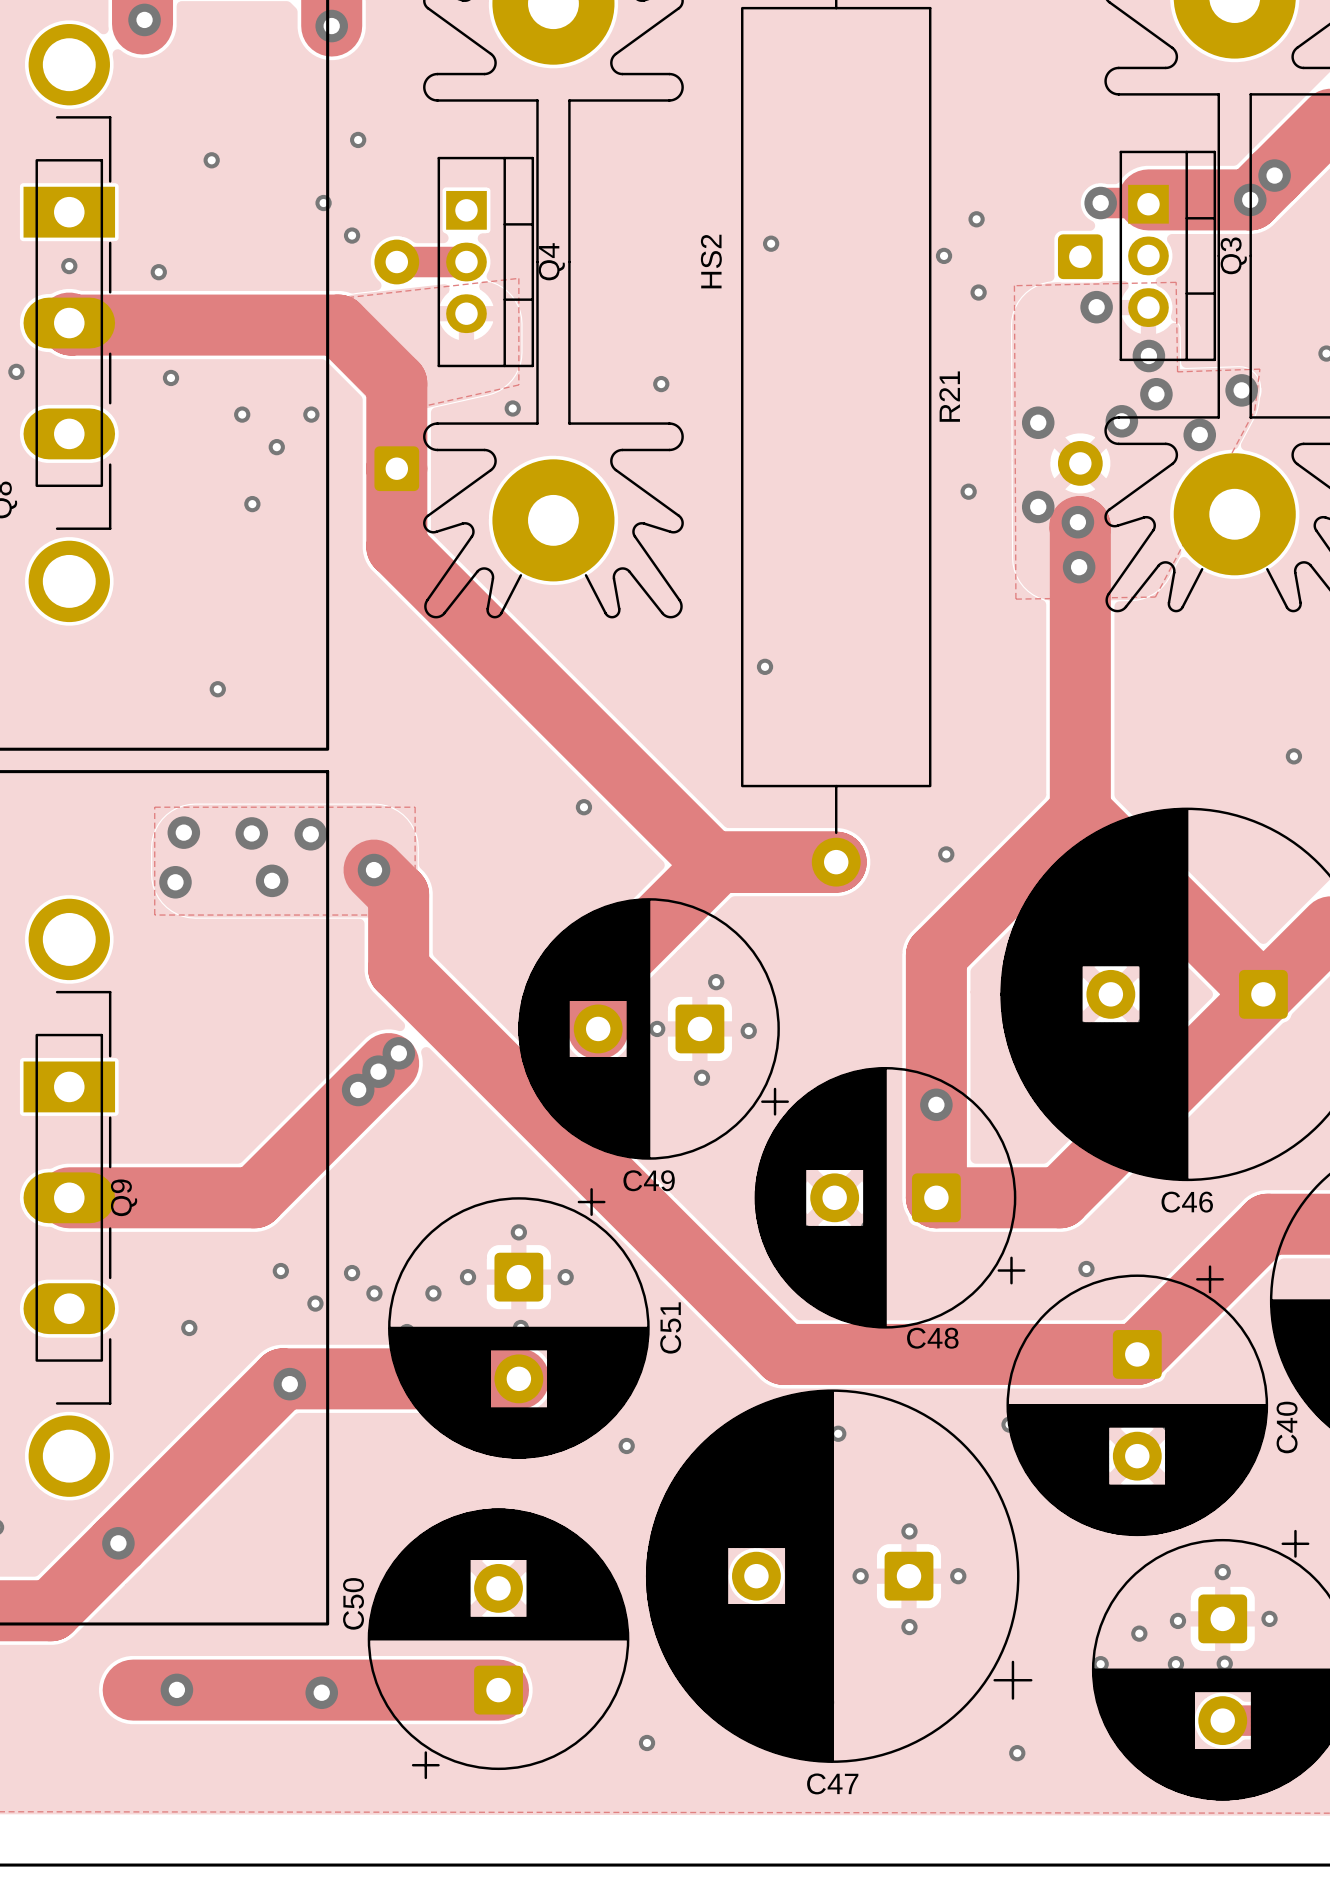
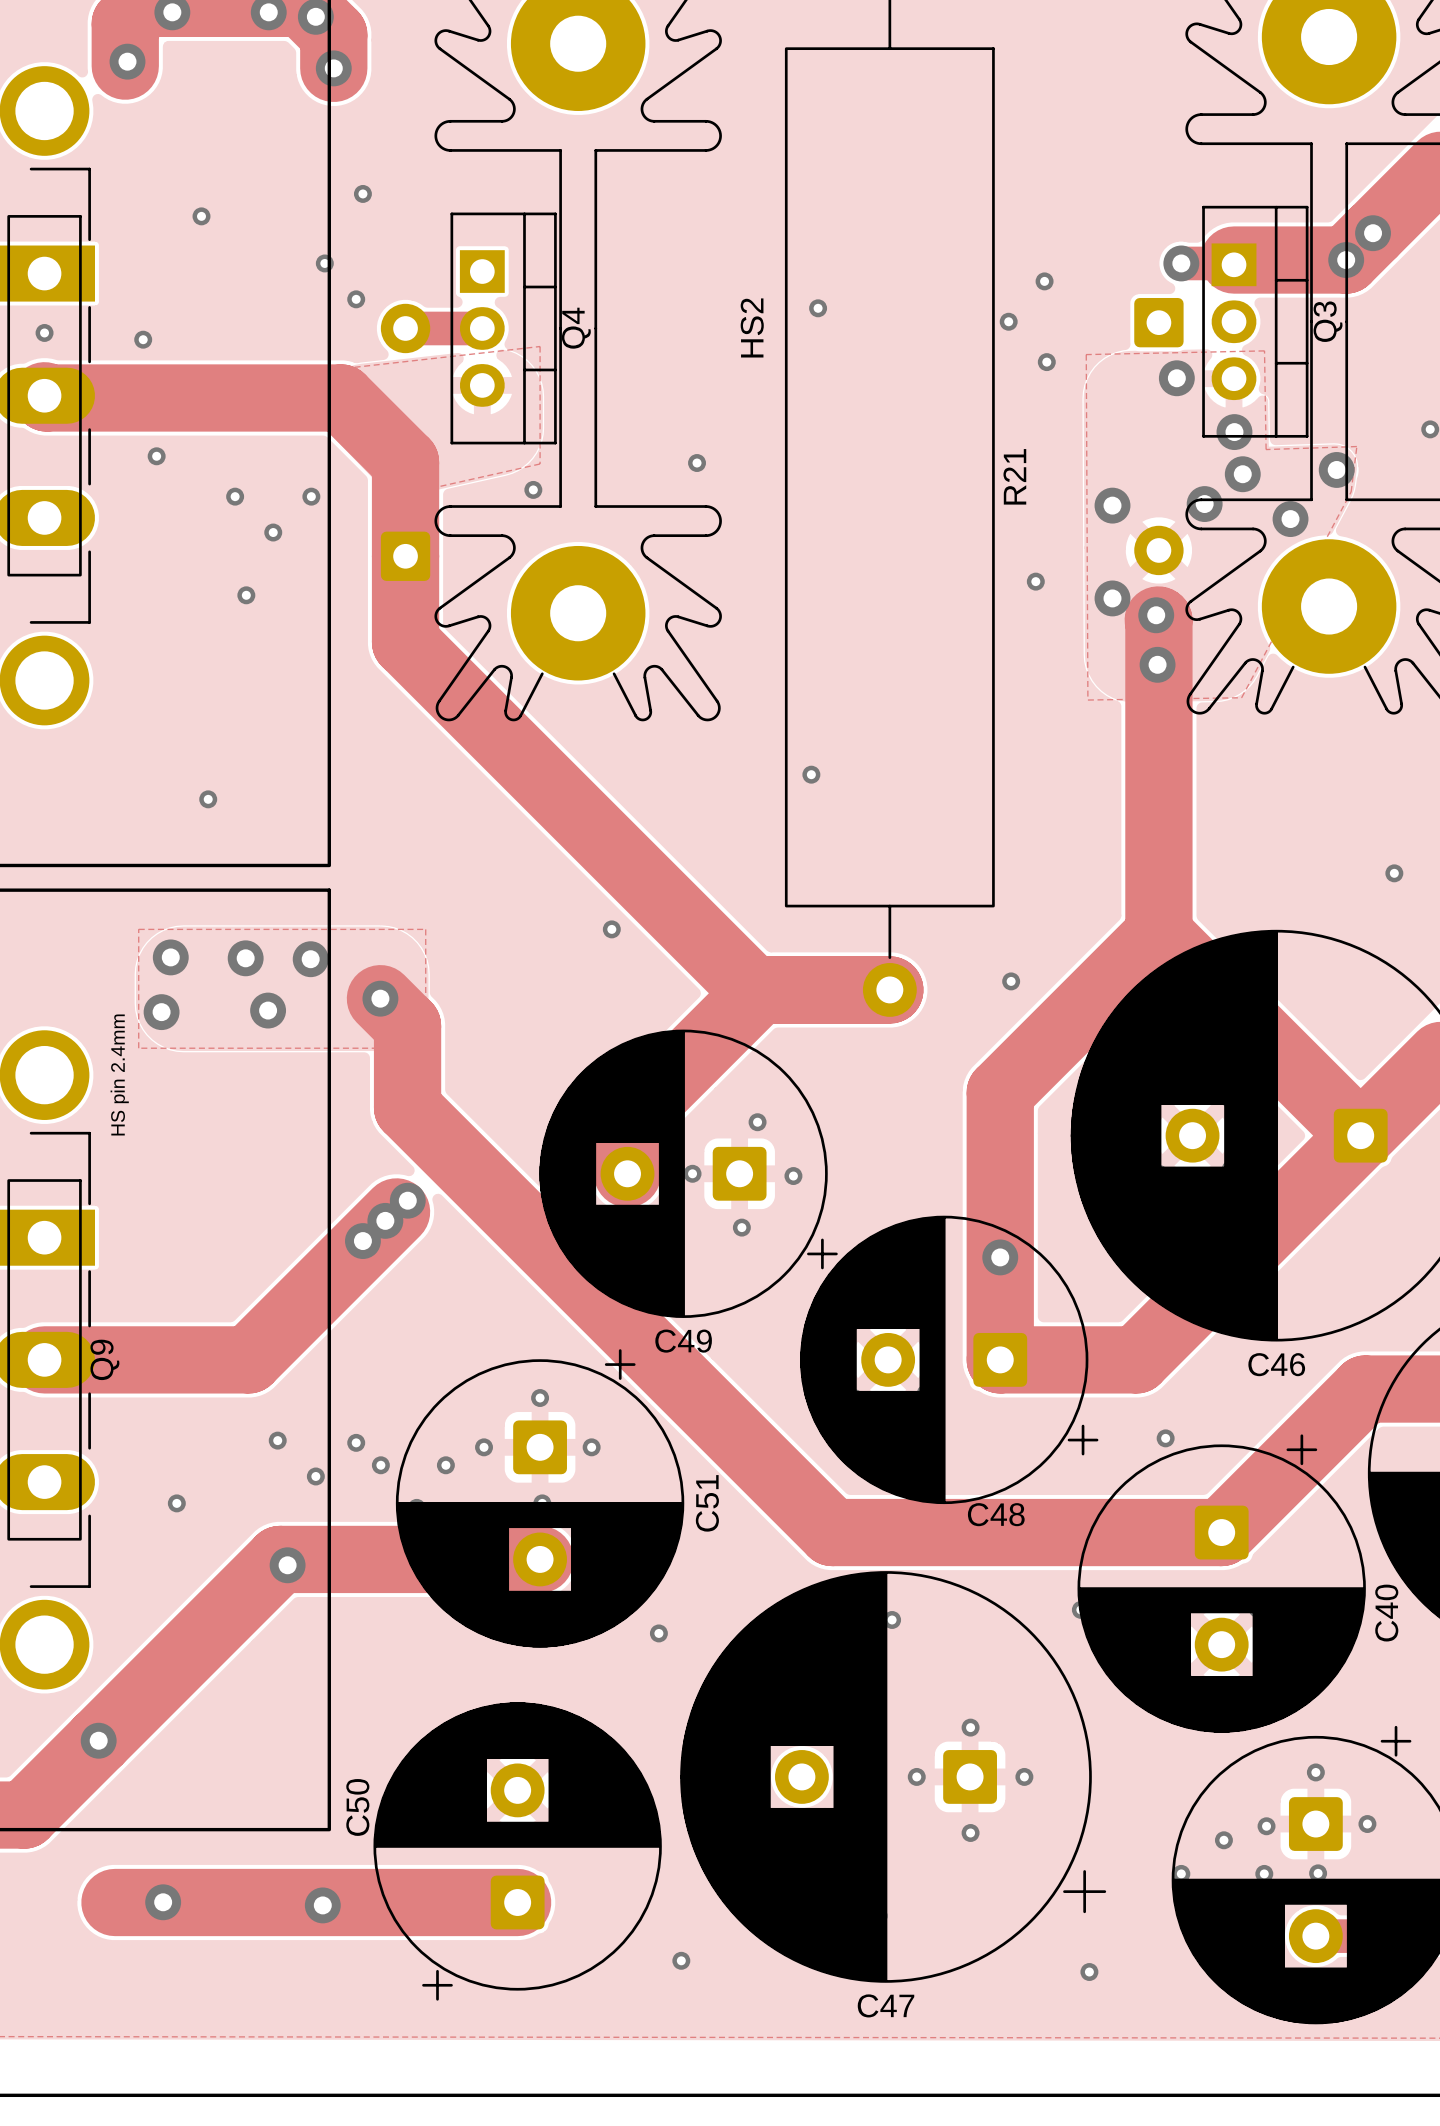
Q9 text: none -> HS pin 2.4mm (119, 1074)

